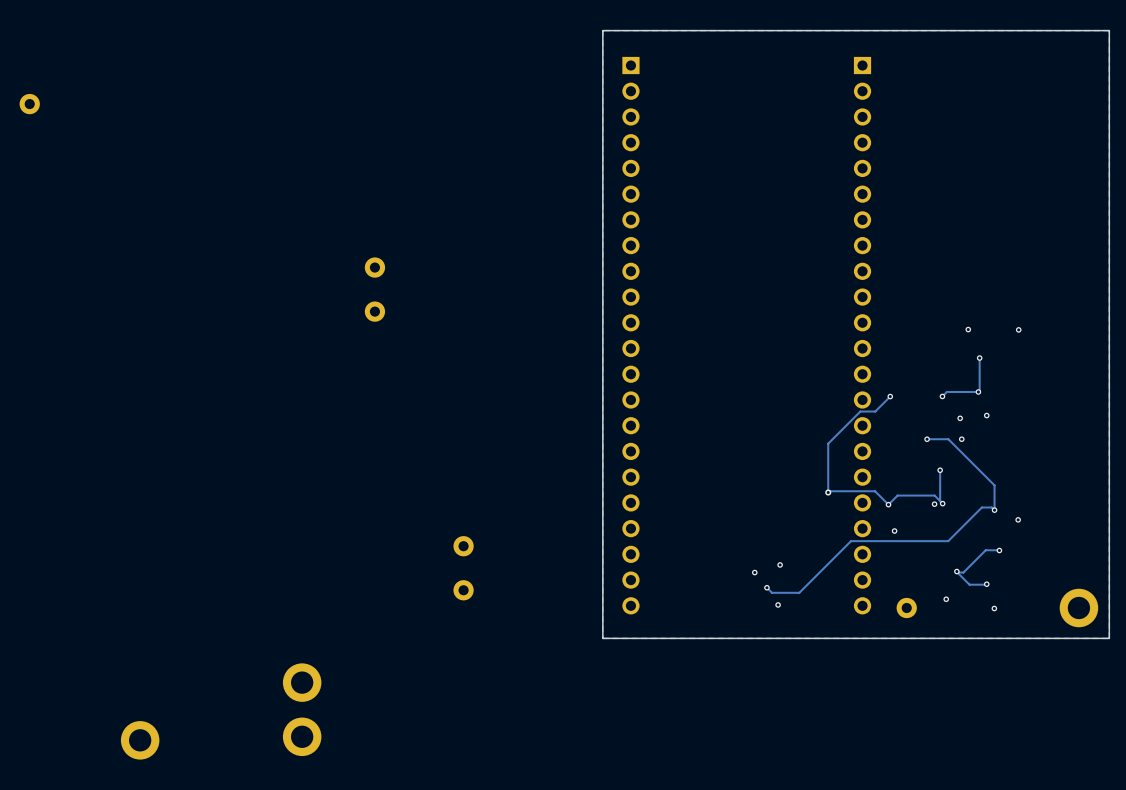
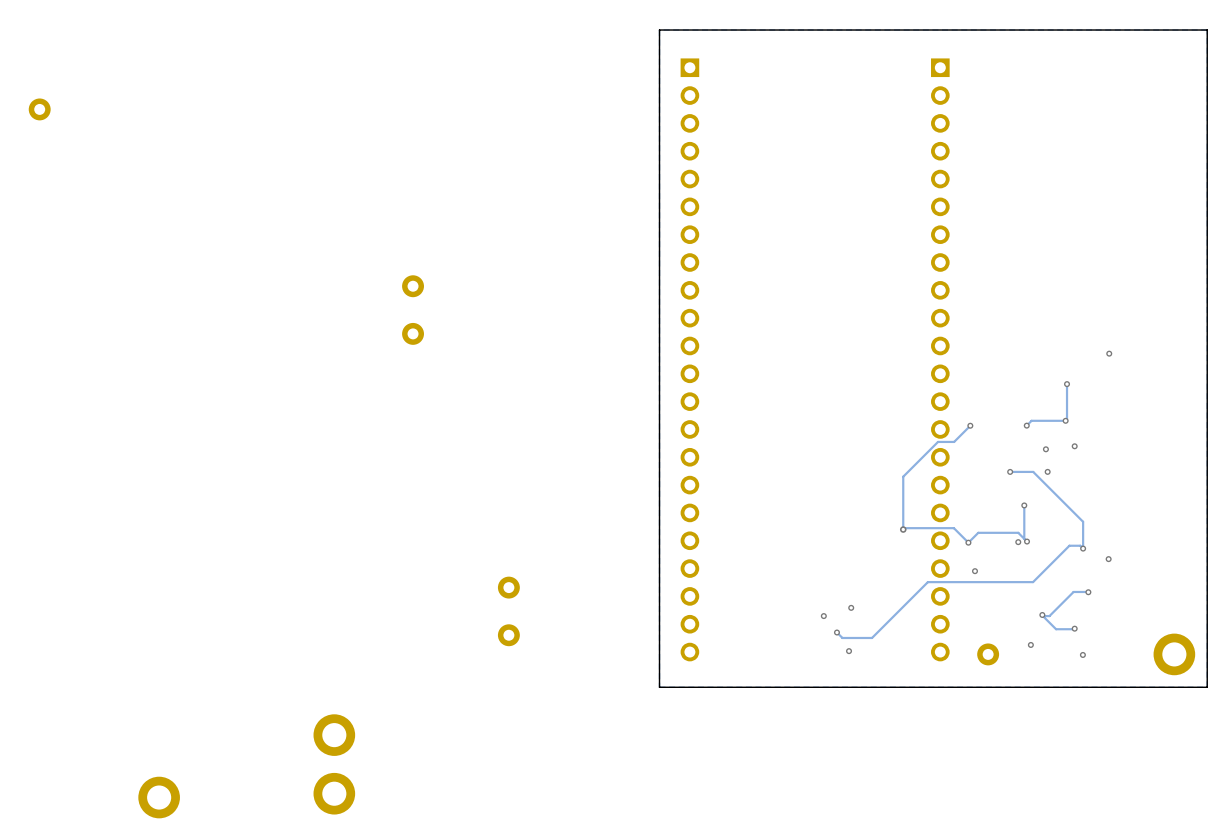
via: (968, 329) -> none

